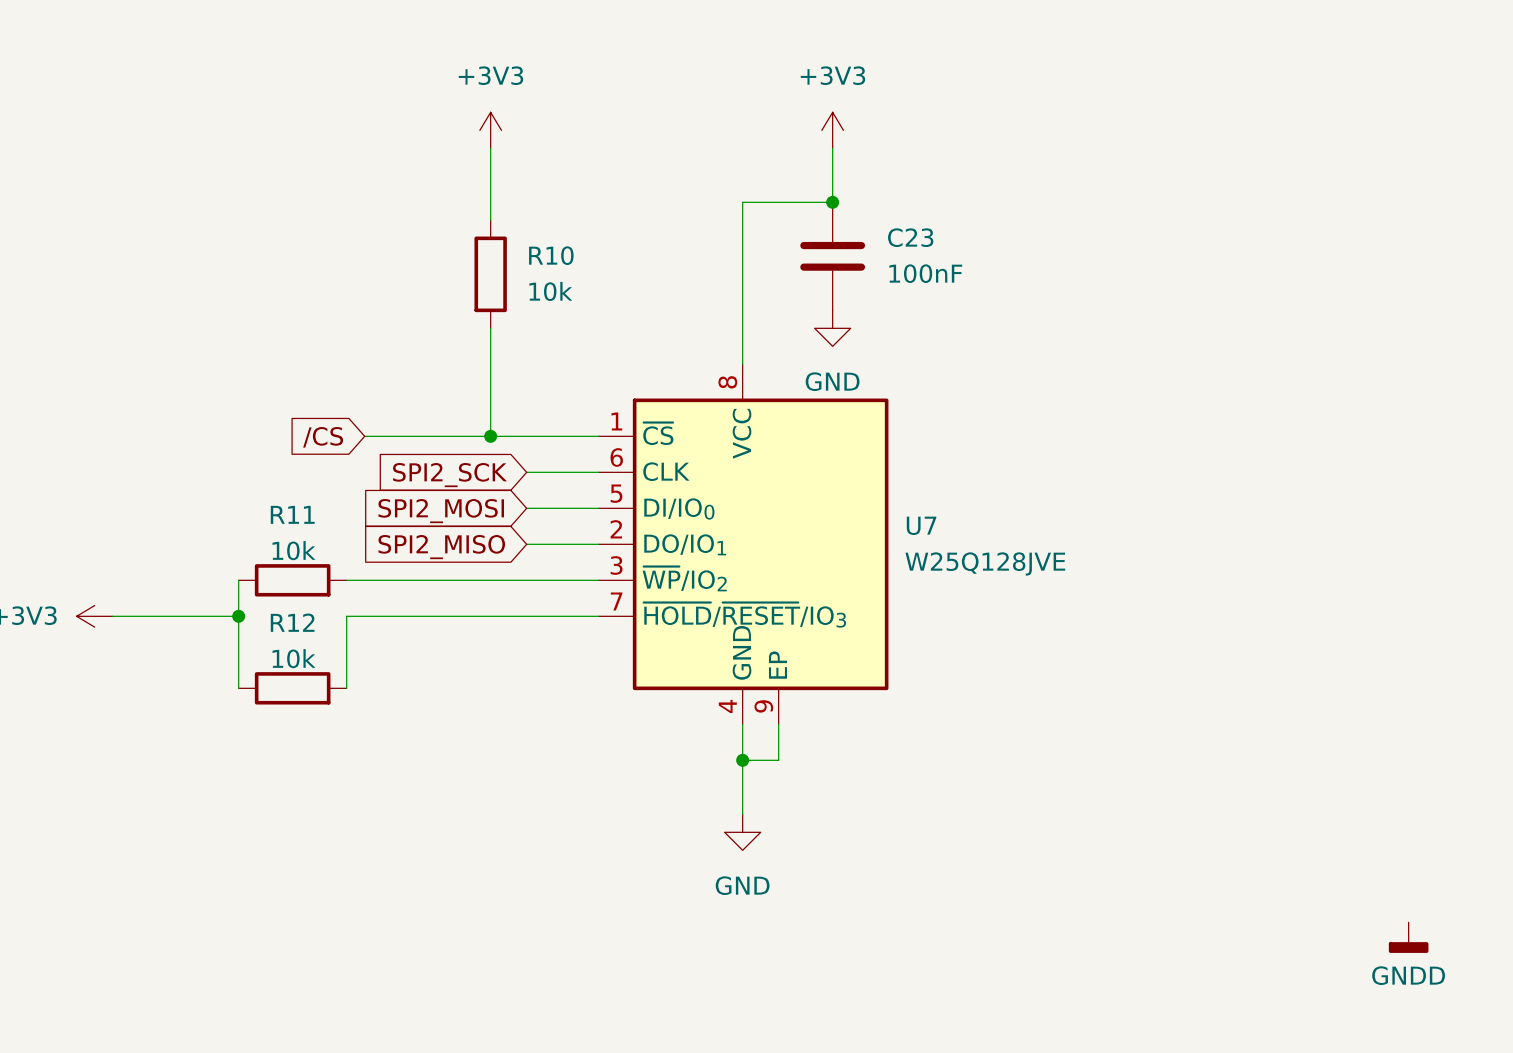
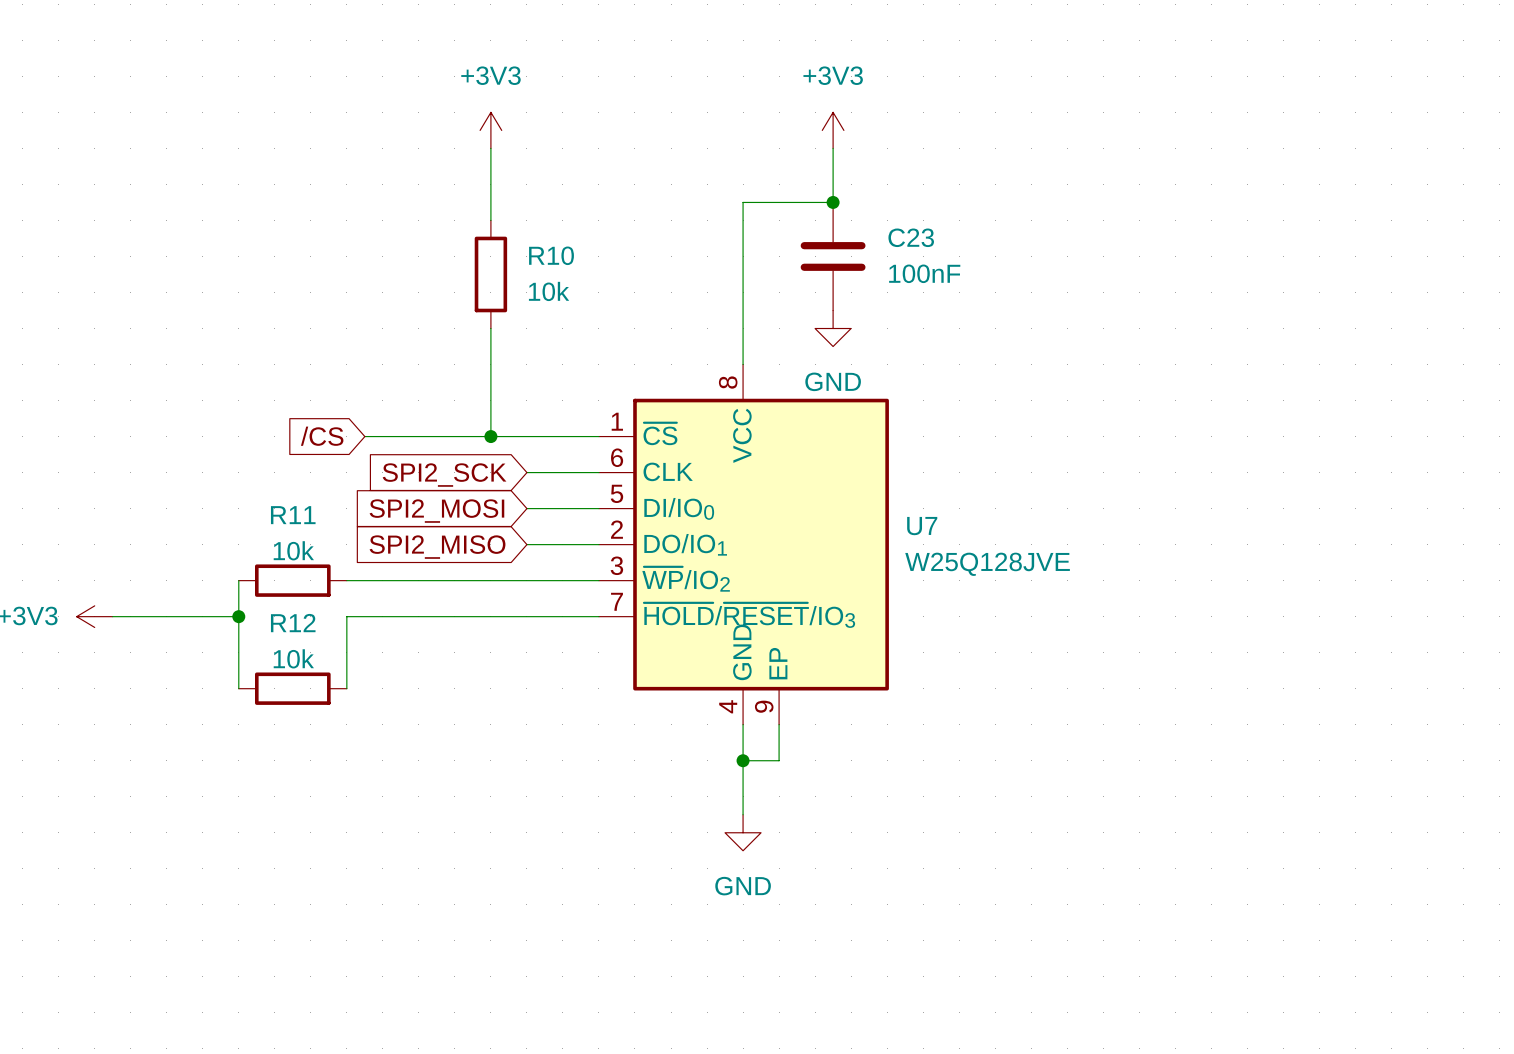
power symbol: GNDD (1408, 937) -> none

